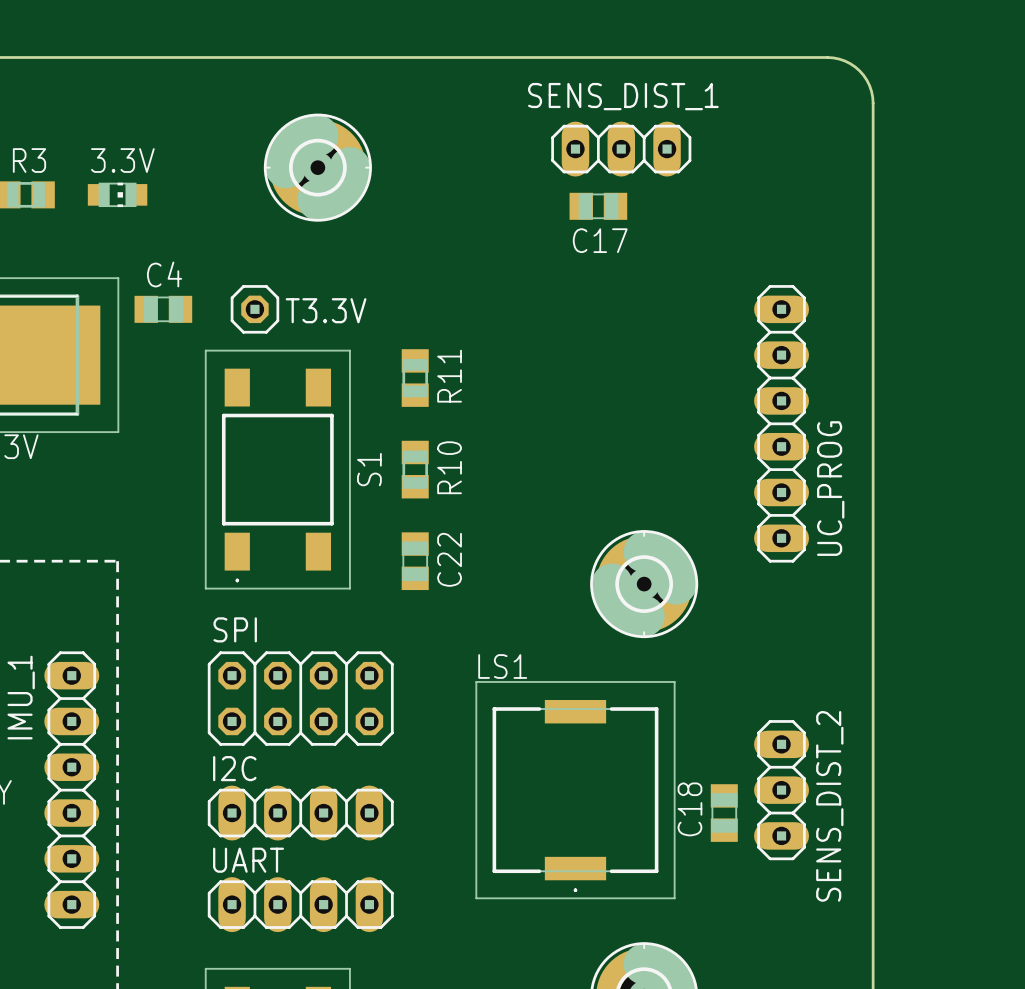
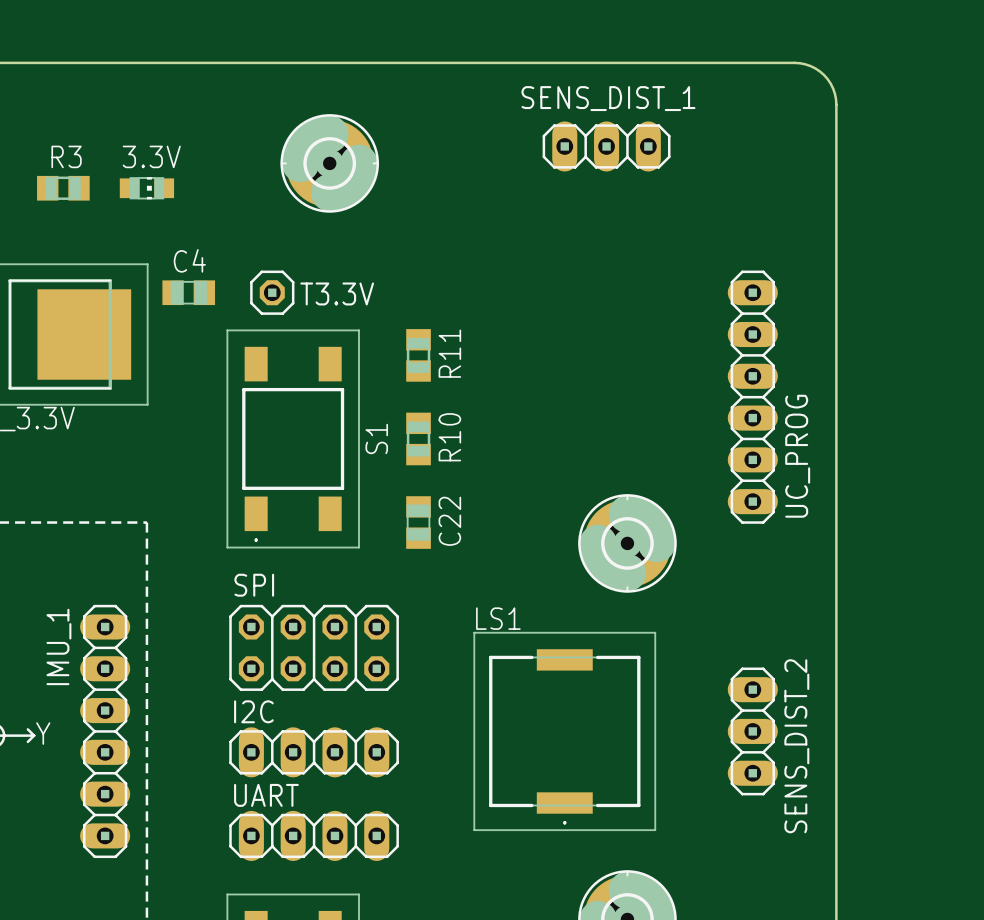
C17: (598, 206) -> none
C18: (724, 813) -> none

